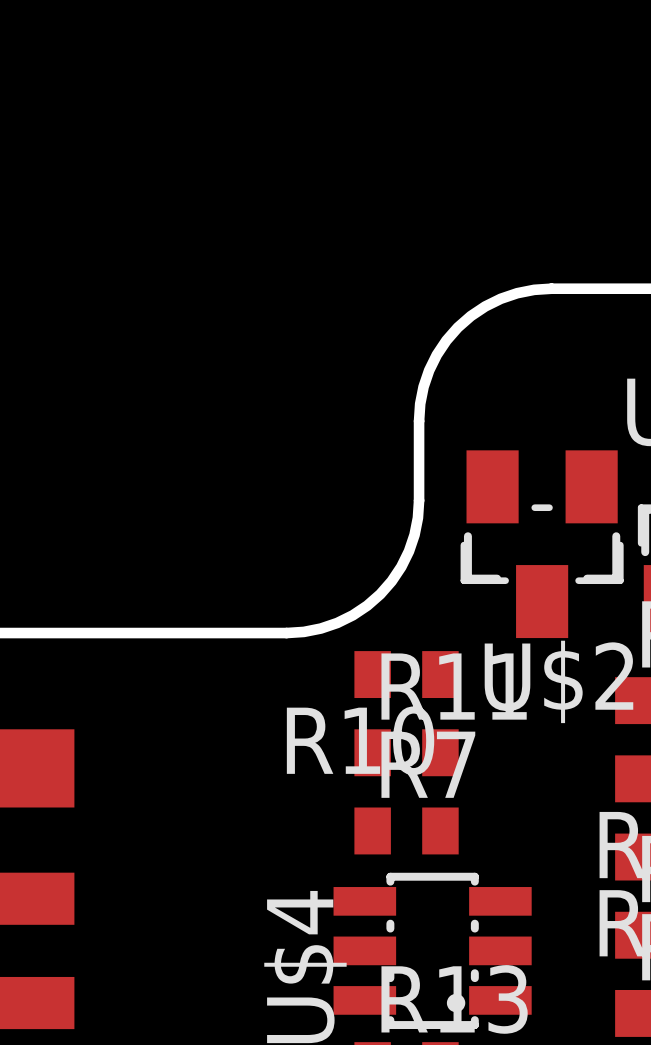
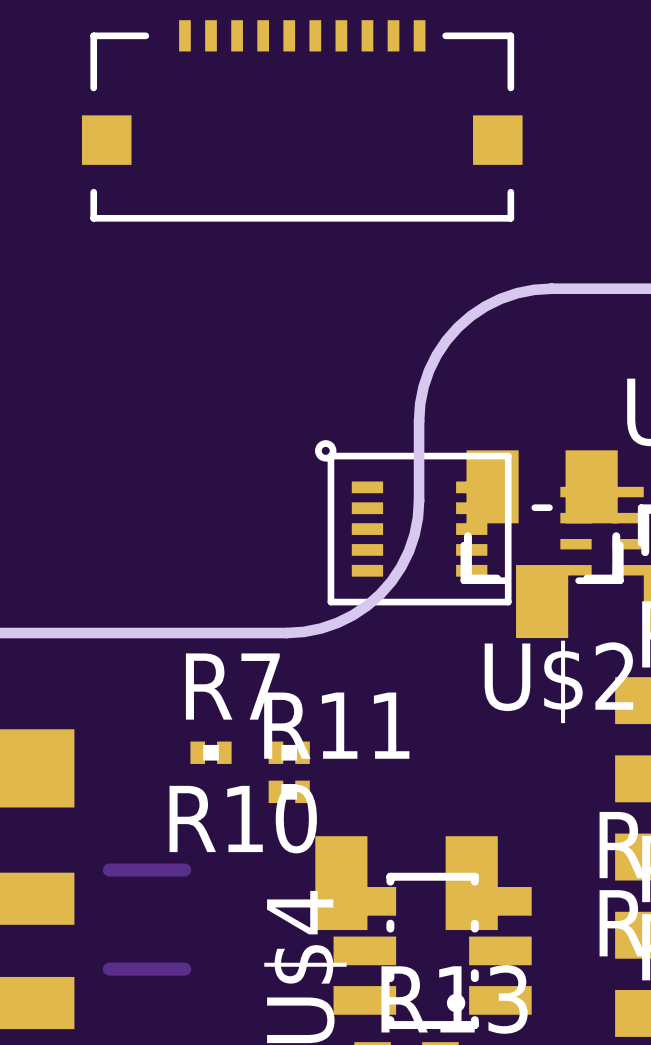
part: none -> (302, 120)
part: none -> (413, 522)
part: none -> (602, 531)
R10 footprint: [354, 651, 459, 699] -> [268, 741, 310, 764]
R11 footprint: [354, 729, 459, 777] -> [268, 780, 310, 804]
R7 footprint: [354, 807, 459, 855] -> [190, 741, 232, 764]
track: none -> (109, 870) (184, 870)
part: none -> (406, 883)
track: none -> (109, 969) (184, 969)

